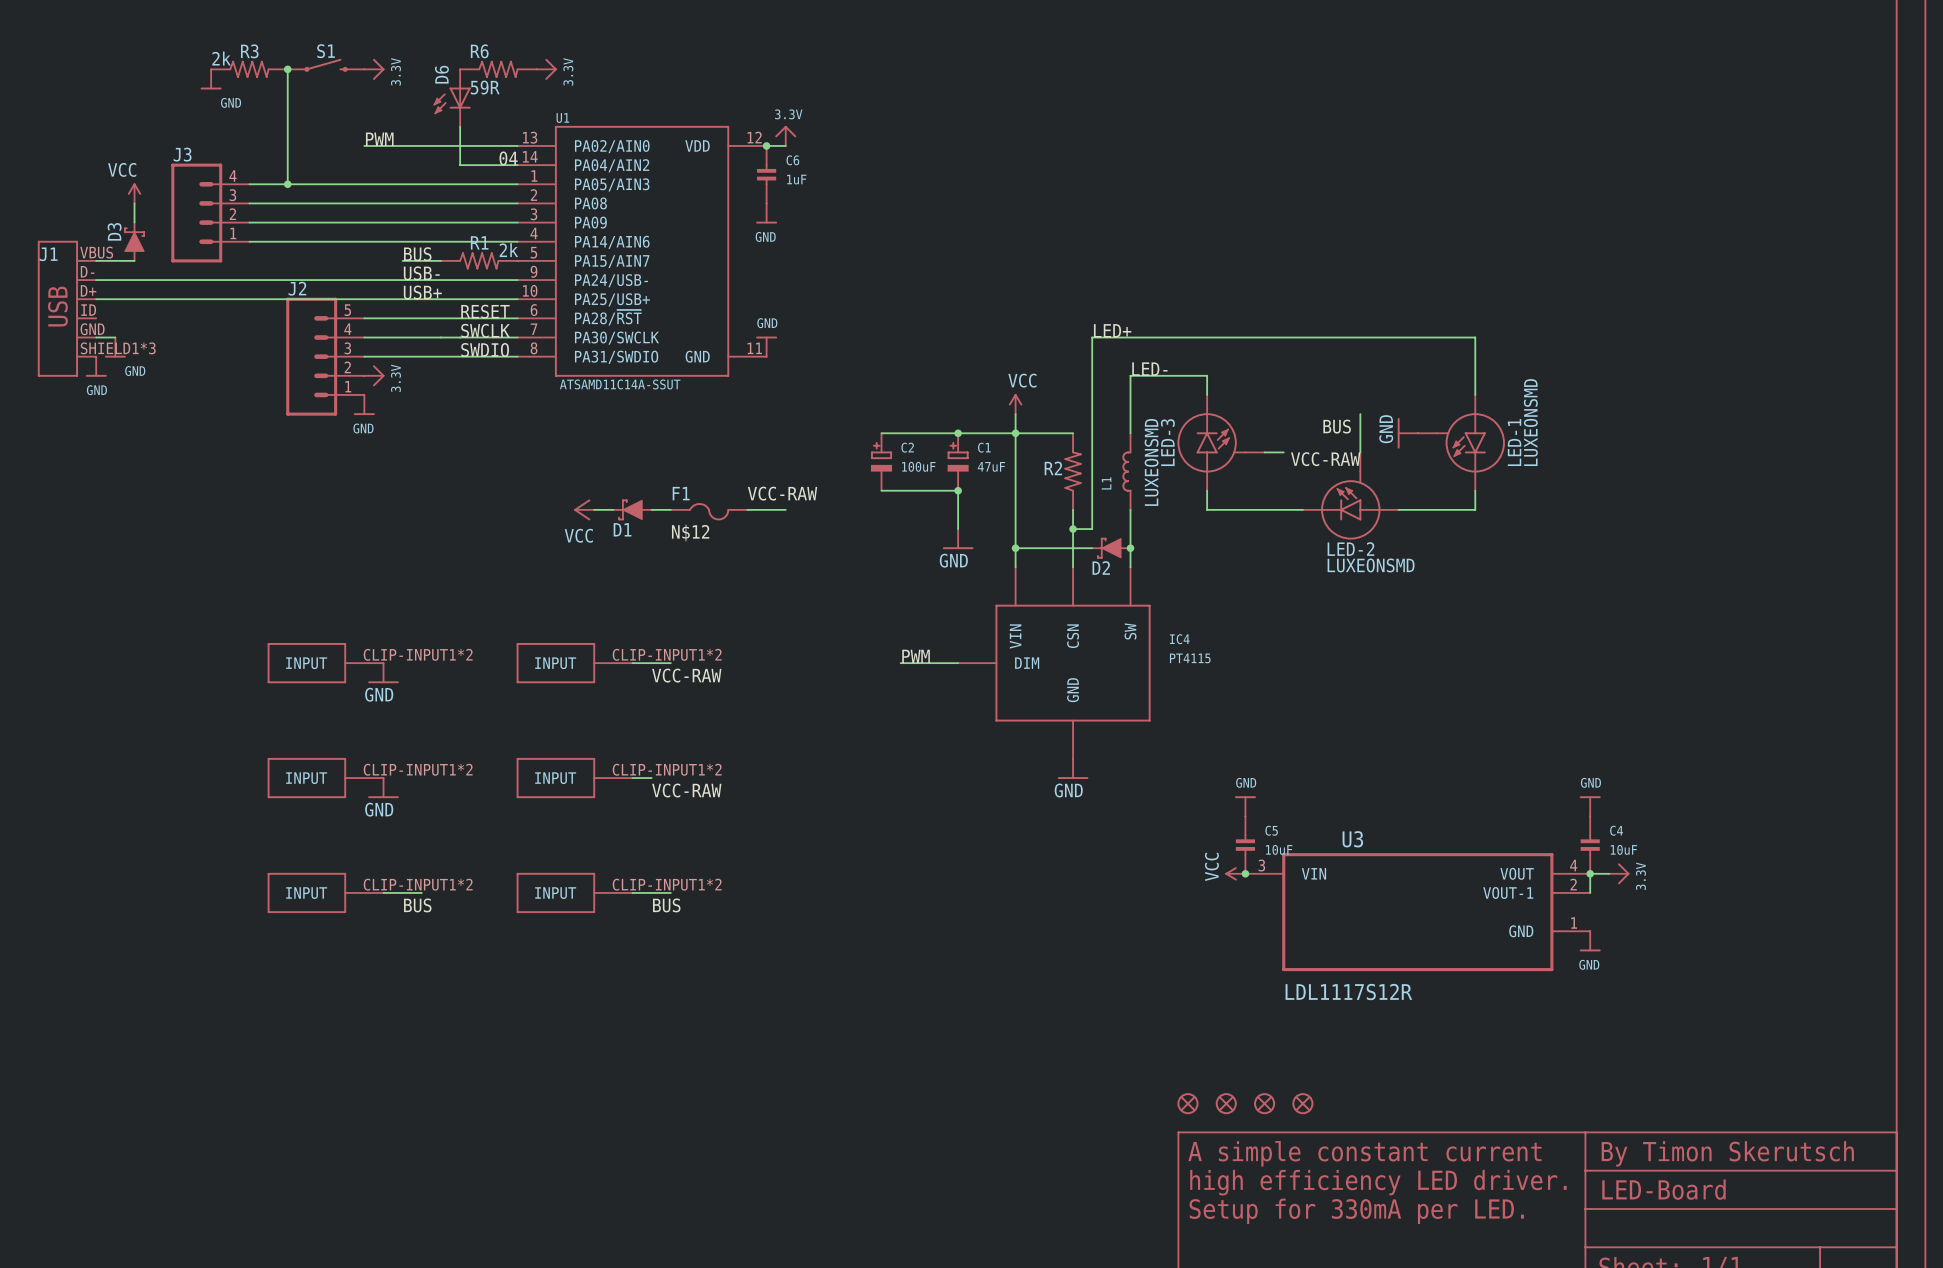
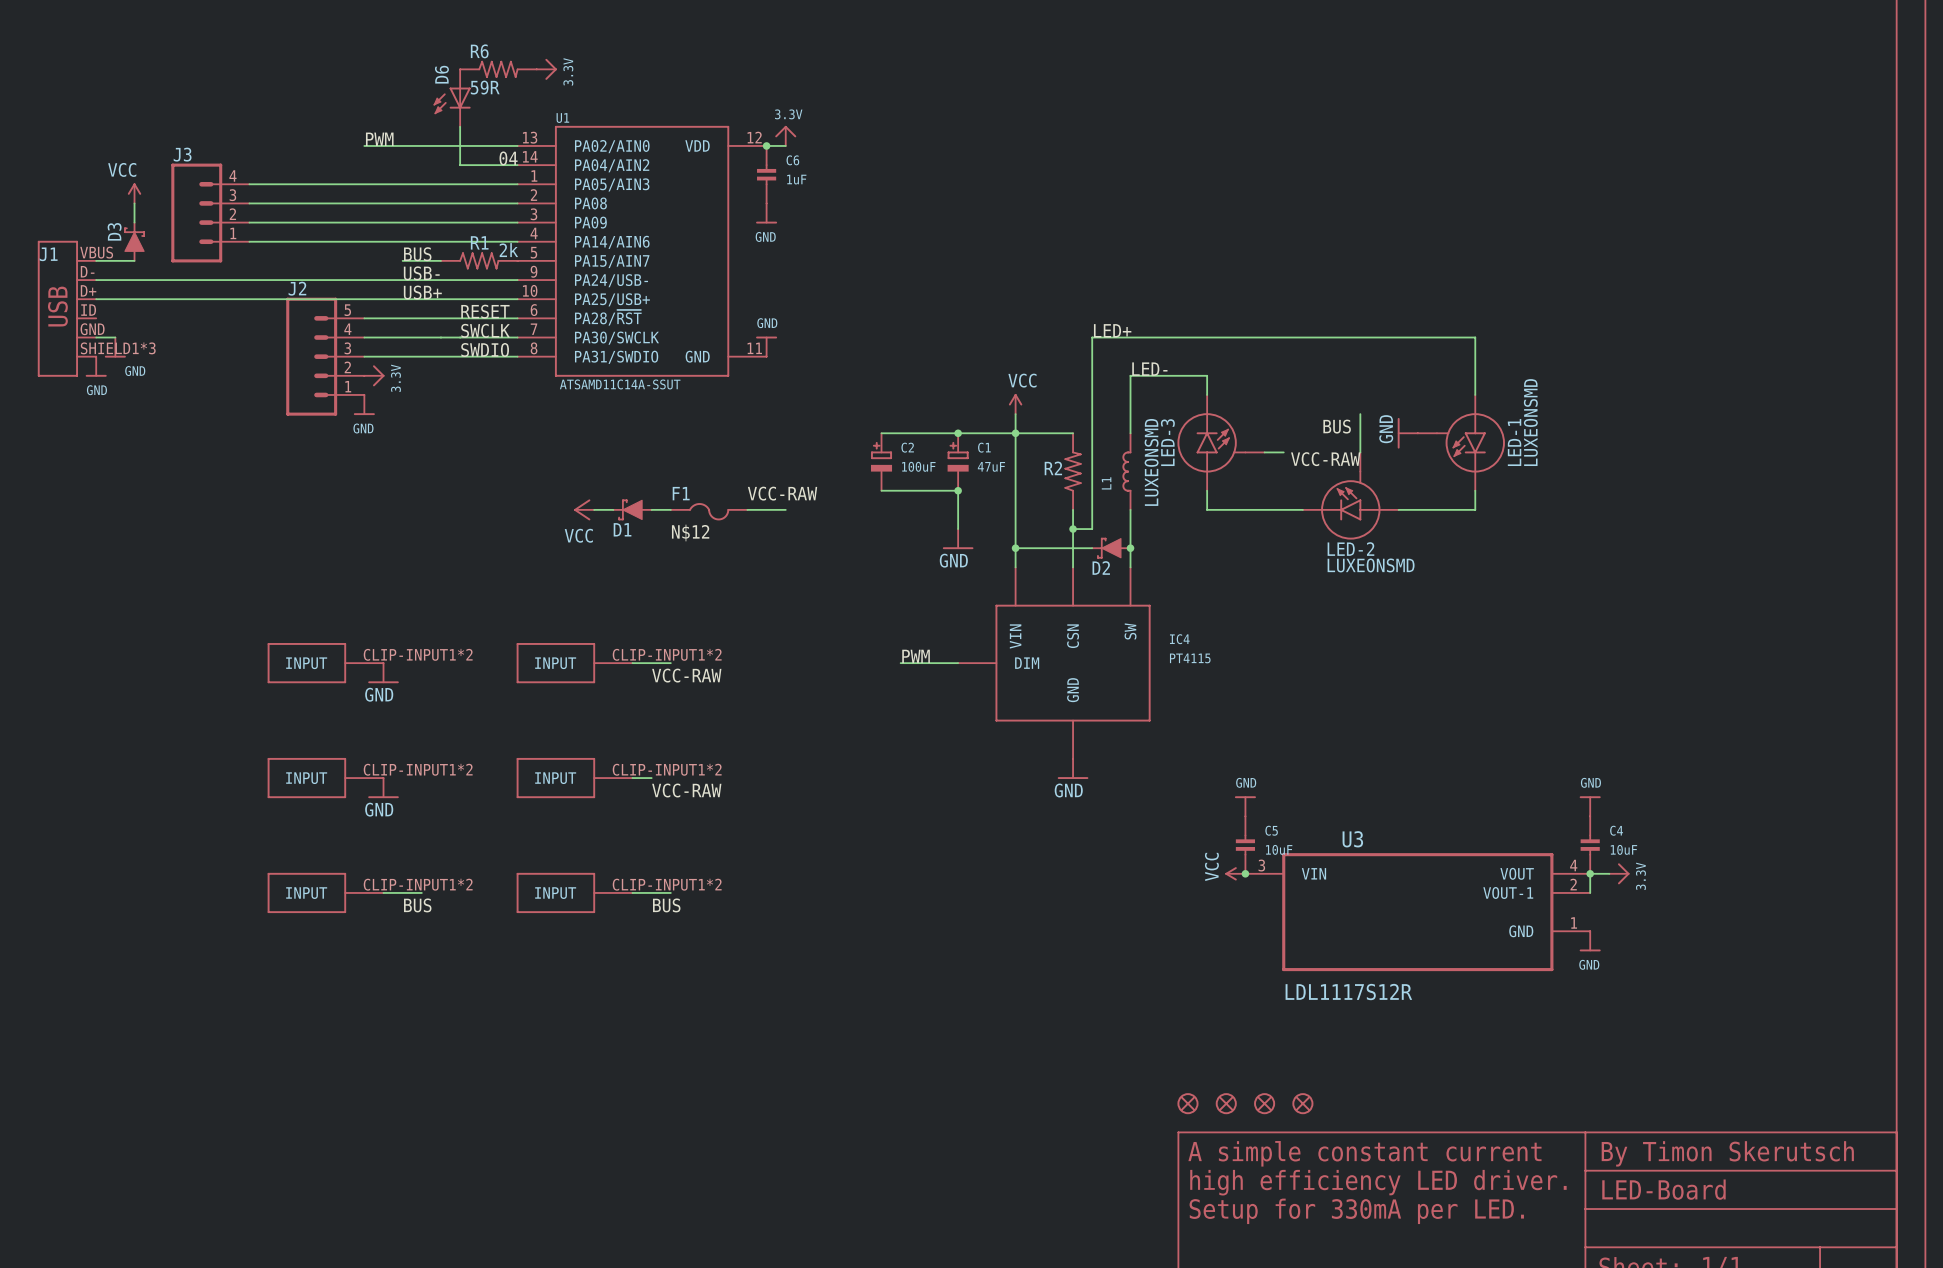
S1: (326, 65) -> none
R3: 2k (249, 69) -> none
wire: (287, 69) (287, 184) -> none
junction: (287, 69) -> none
power symbol: 3.3V (374, 69) -> none
power symbol: GND (211, 79) -> none
junction: (287, 184) -> none

